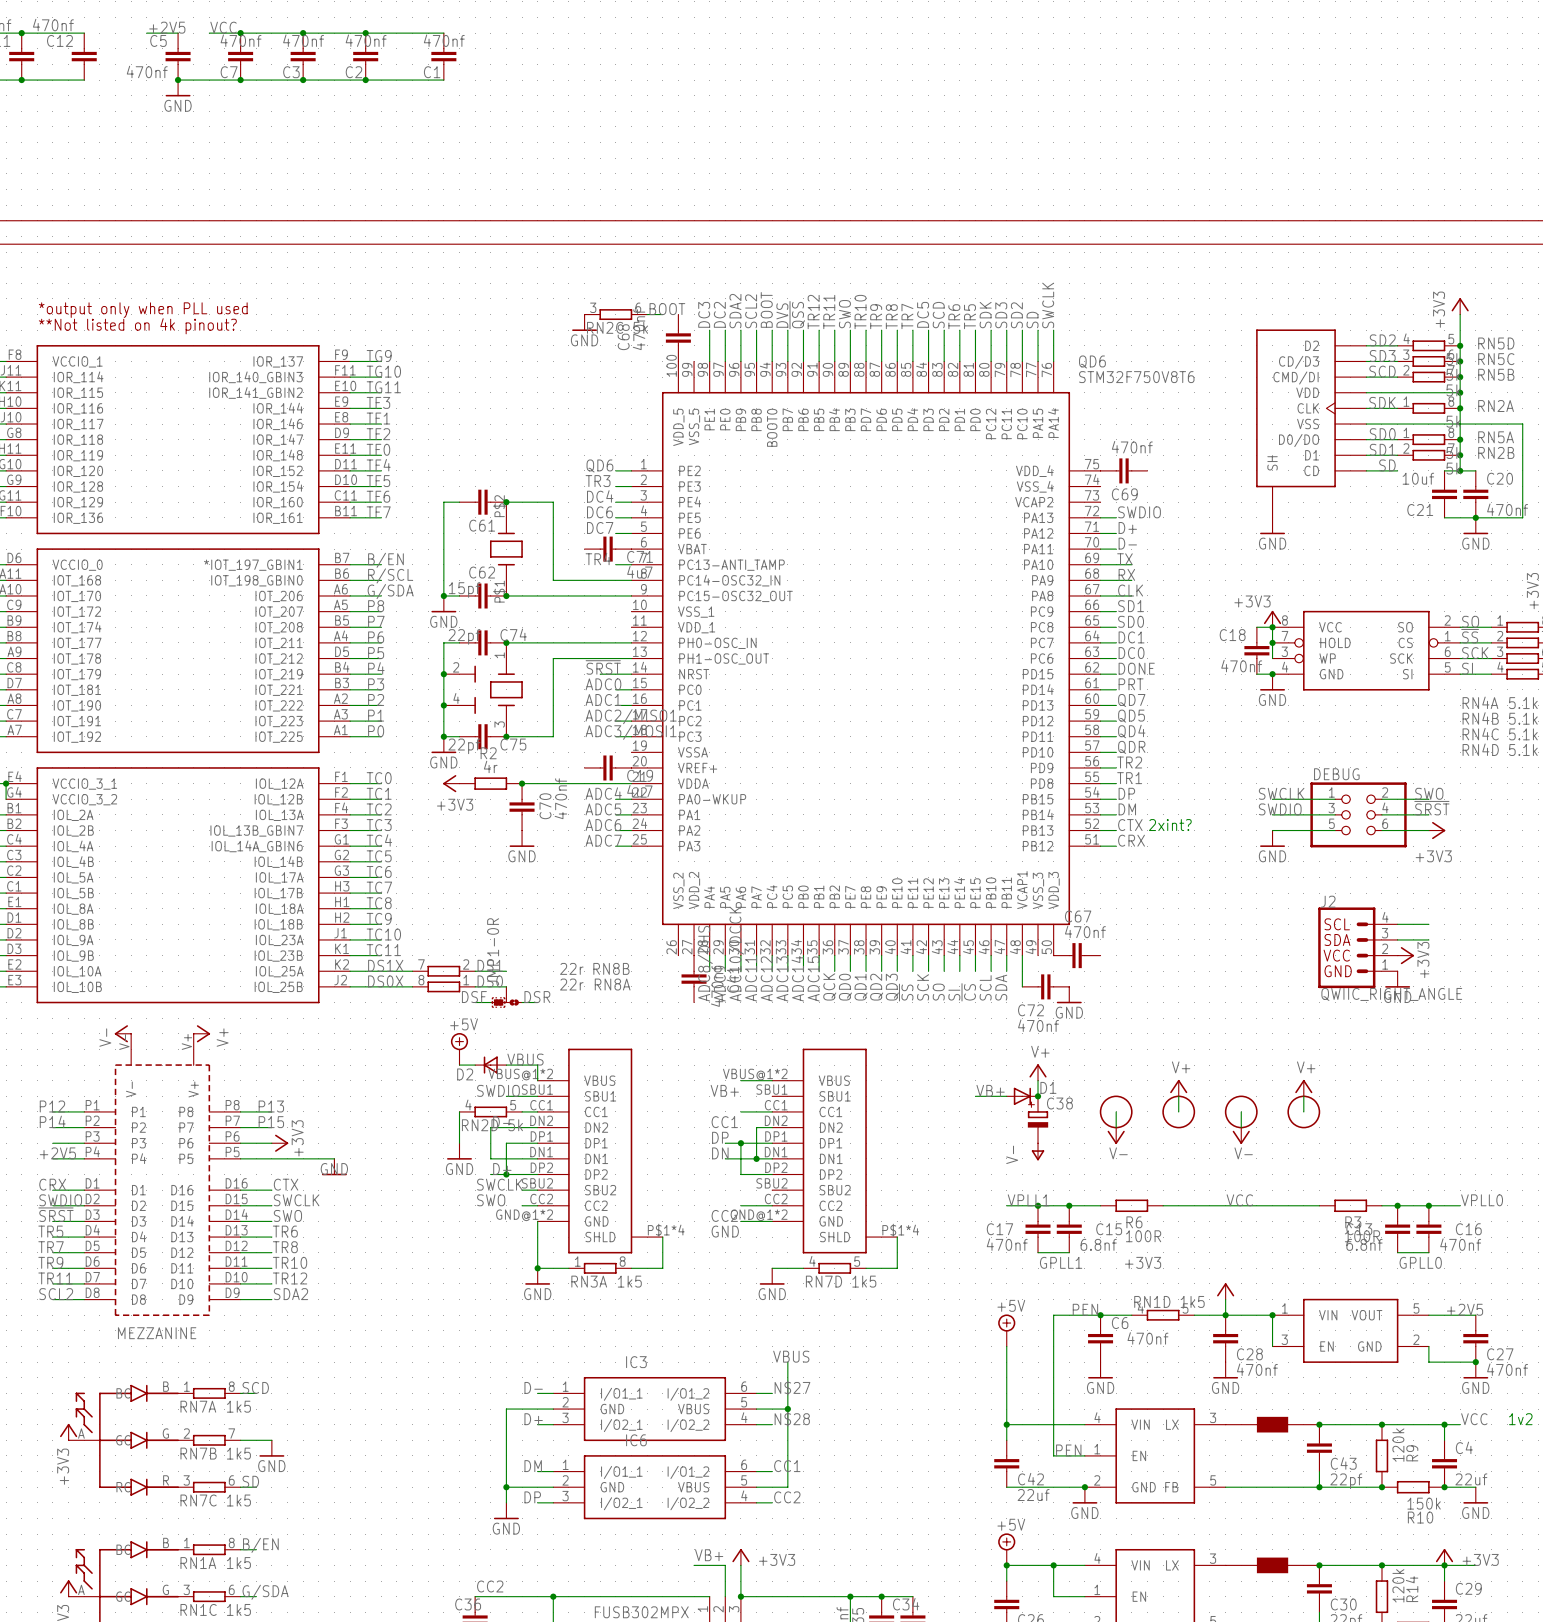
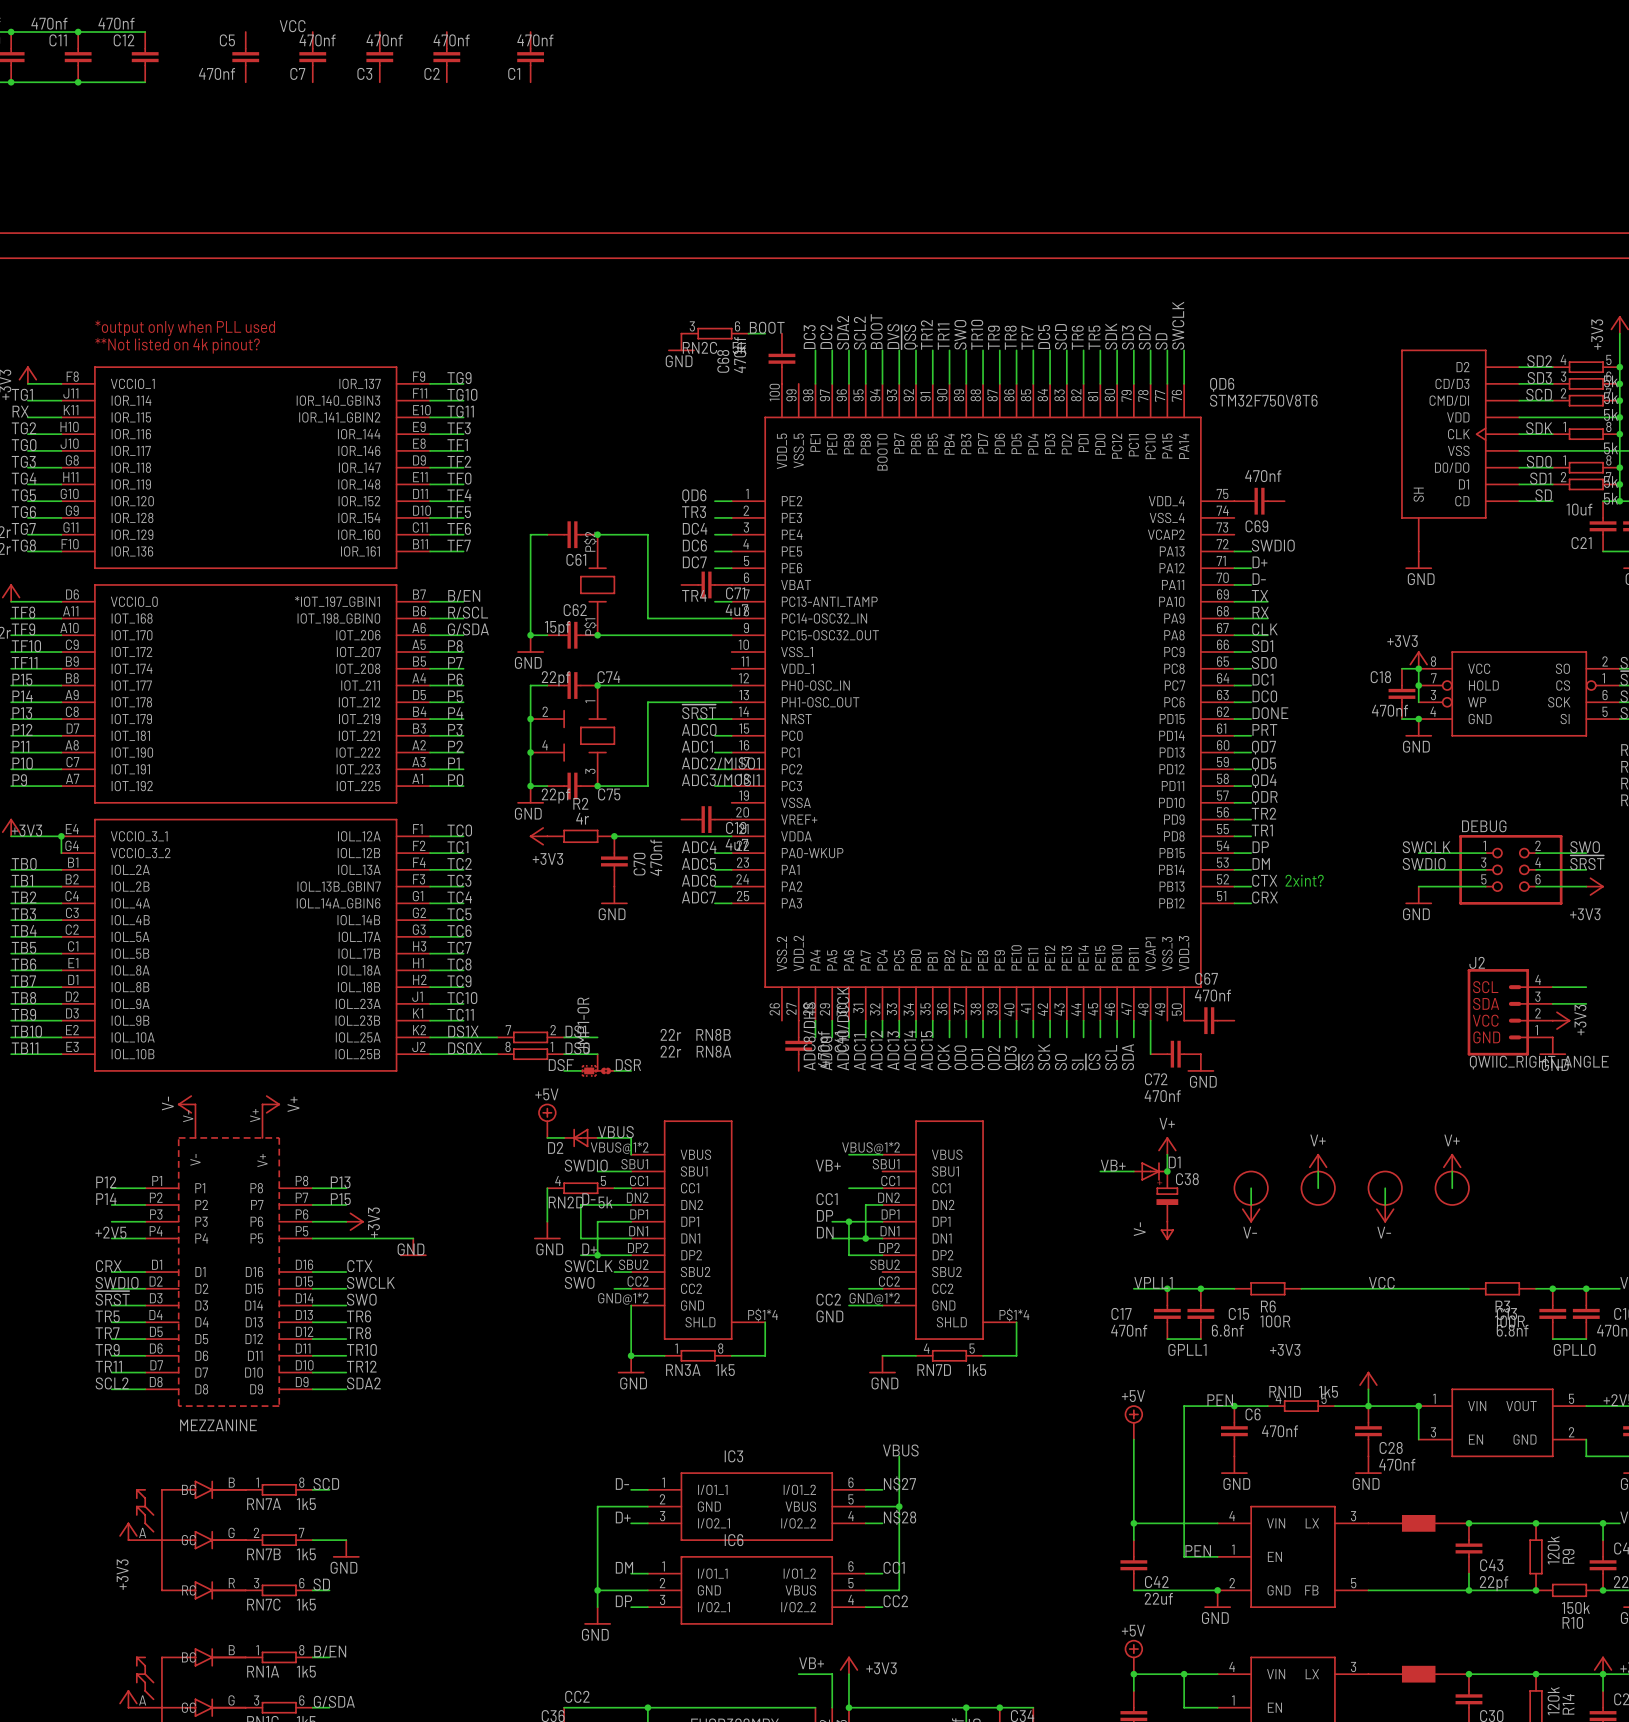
label: +2V5 (167, 27) -> none
wire: (146, 33) (178, 33) -> none
wire: (209, 33) (443, 33) -> none
junction: (240, 33) -> none
junction: (303, 33) -> none
junction: (365, 33) -> none
wire: (178, 80) (443, 80) -> none
junction: (178, 80) -> none
junction: (240, 80) -> none
junction: (303, 80) -> none
junction: (365, 80) -> none
power symbol: GND (178, 88) -> none

